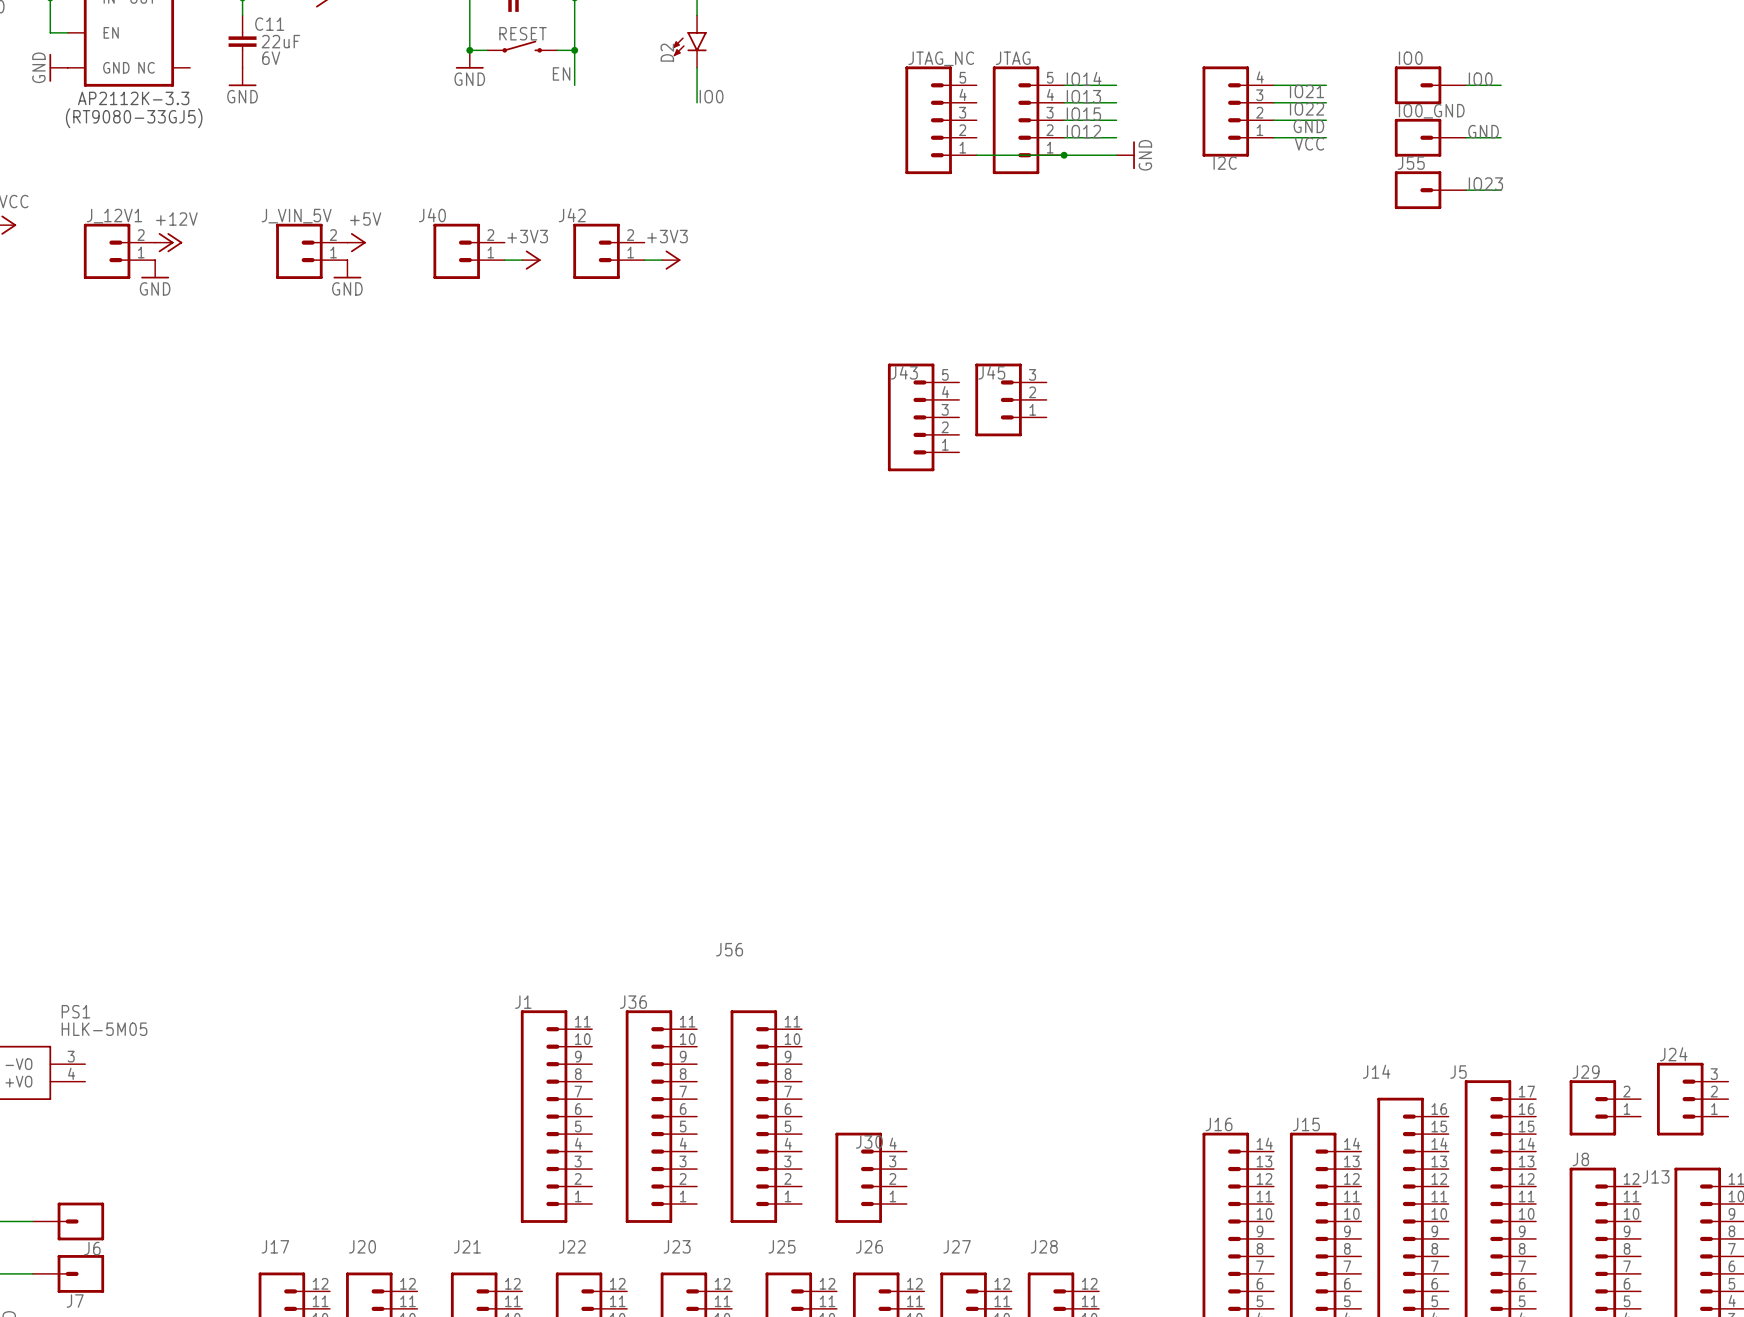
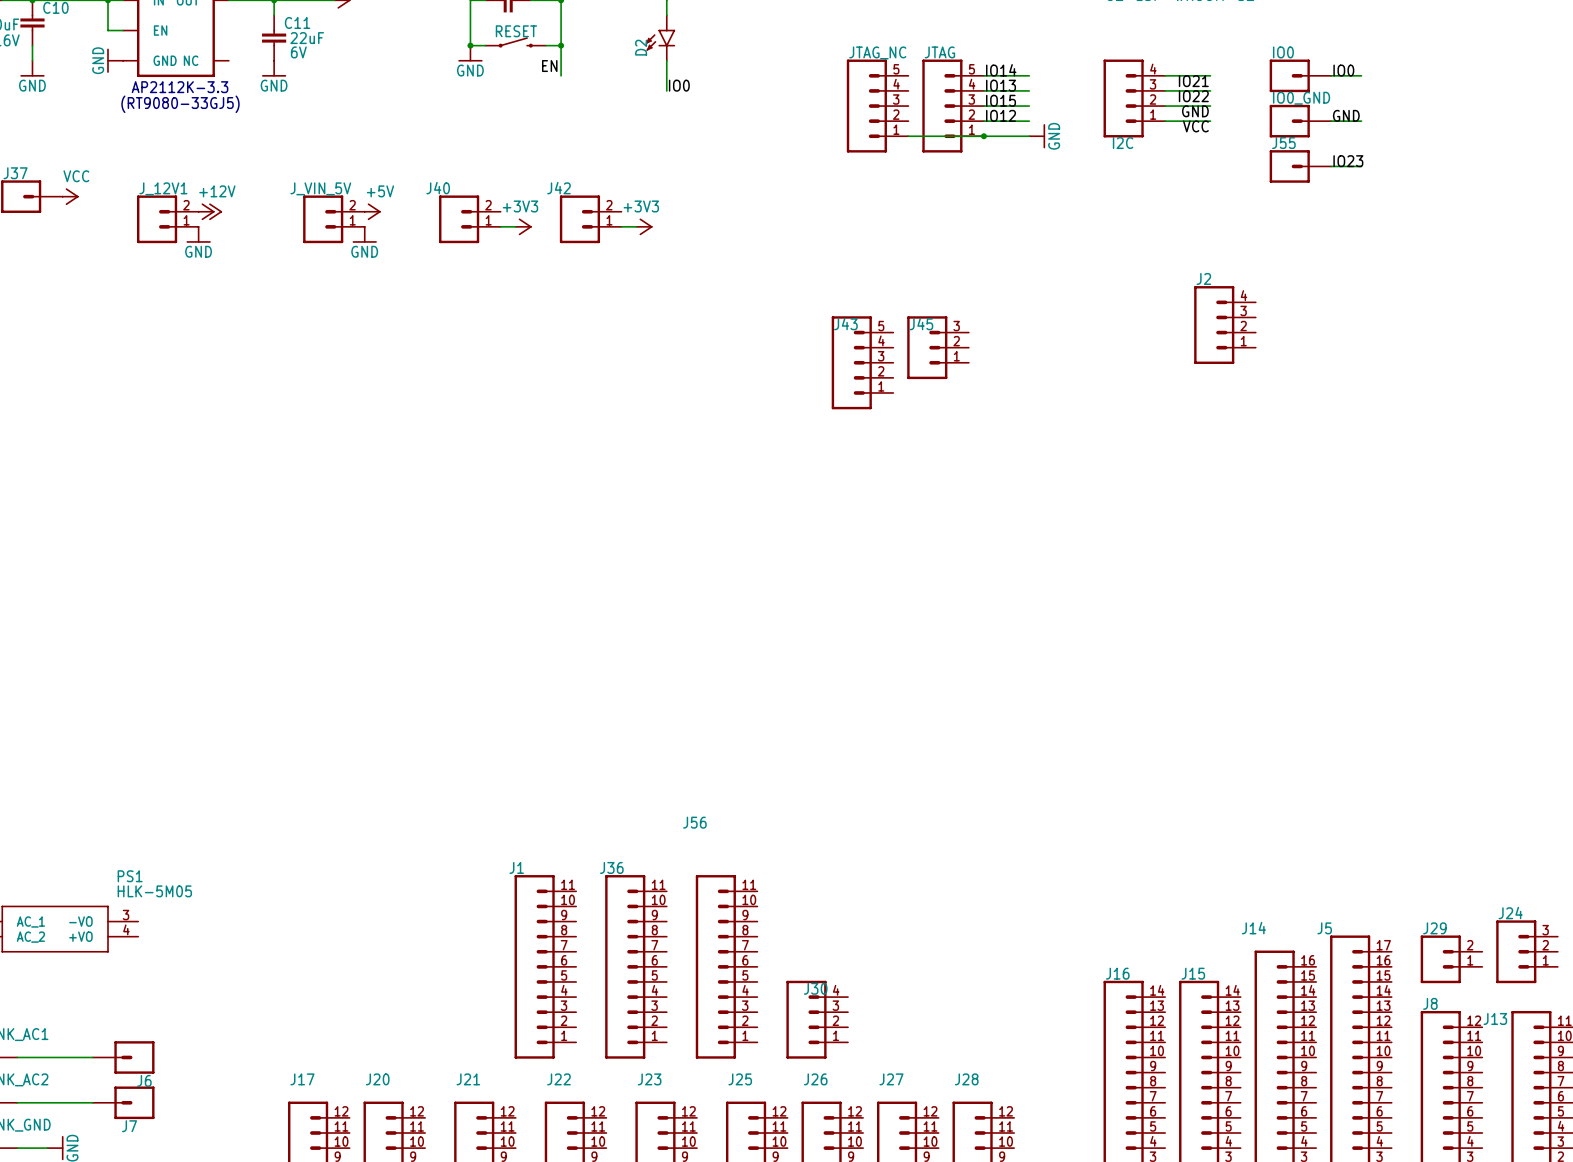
J2: none -> (1224, 325)

